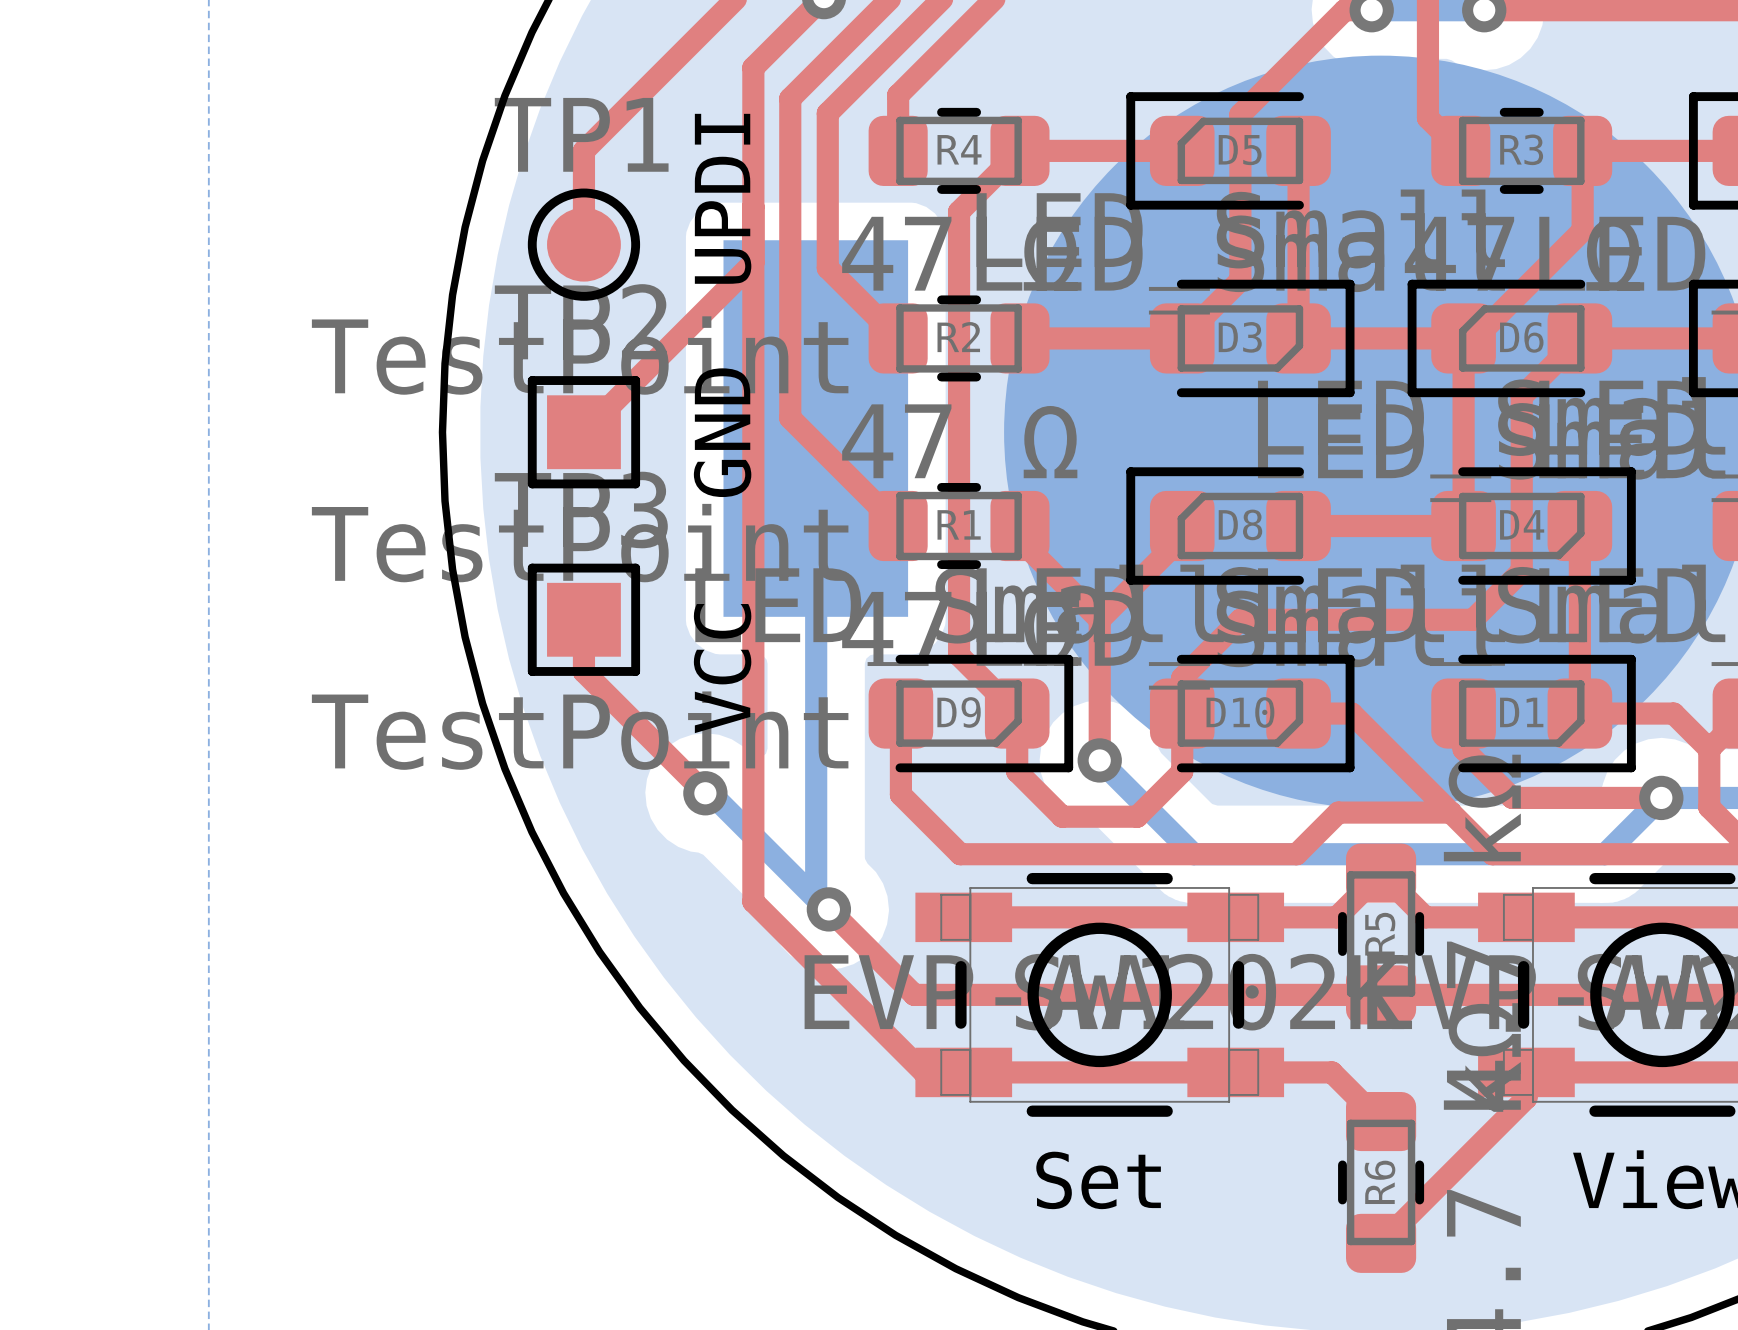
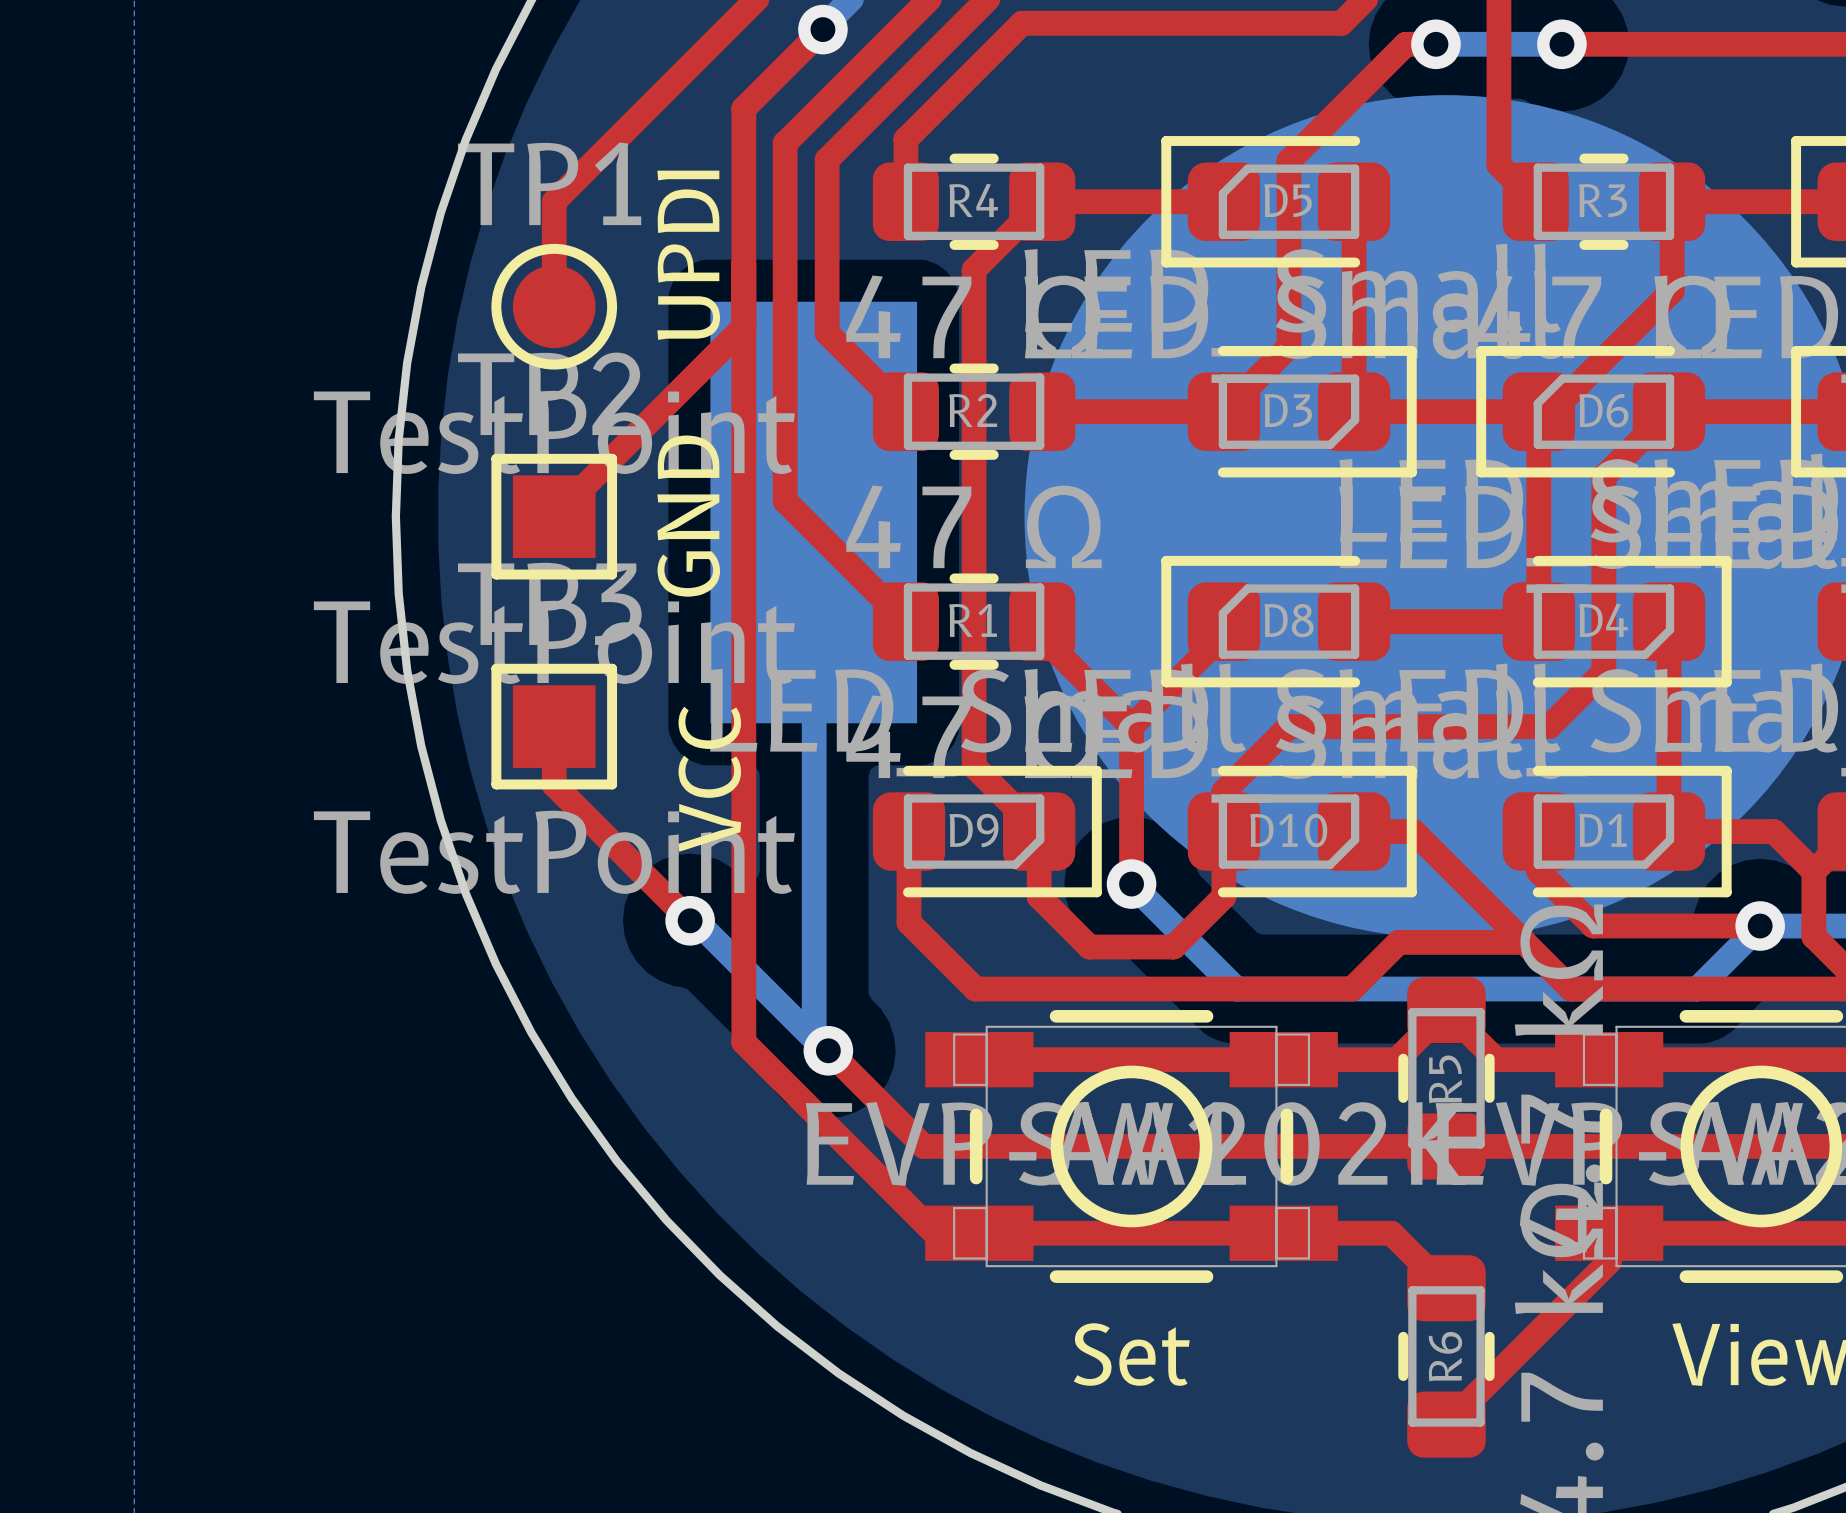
text position: UPDI (723, 198) -> UPDI (688, 255)
text position: GND (722, 432) -> GND (688, 516)

